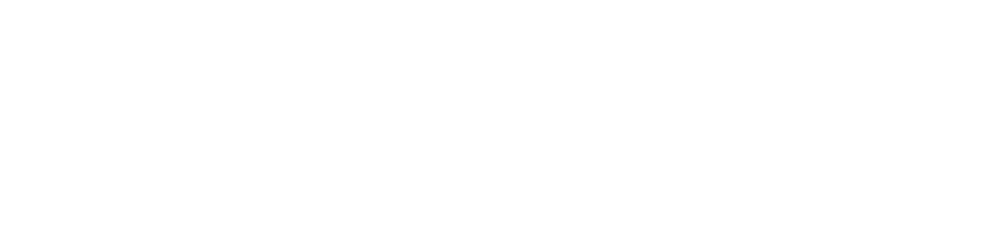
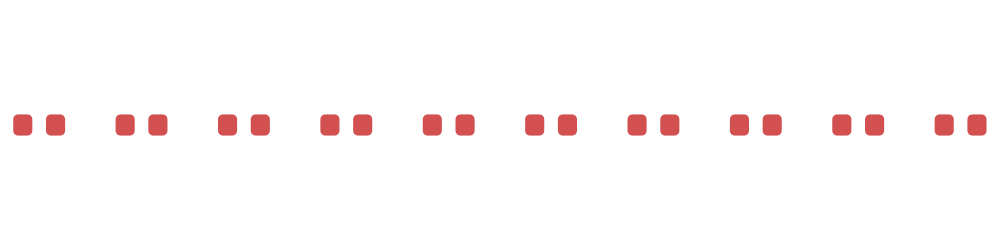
part: none -> (39, 124)
part: none -> (141, 124)
part: none -> (243, 124)
part: none -> (346, 124)
part: none -> (448, 124)
part: none -> (551, 124)
part: none -> (653, 124)
part: none -> (755, 124)
part: none -> (858, 124)
part: none -> (960, 124)

